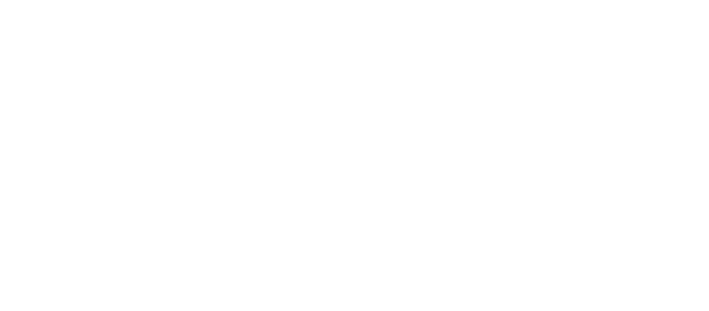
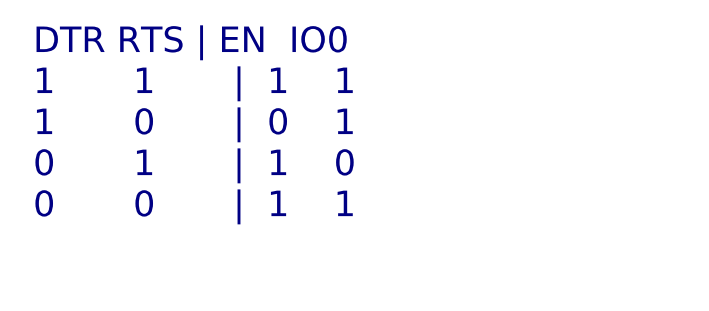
text: none -> DTR RTS | EN IO0 (191, 42)
text: none -> 1 1 | 1 1 (194, 83)
text: none -> 1 0 | 0 1 (194, 124)
text: none -> 0 1 | 1 0 (194, 165)
text: none -> 0 0 | 1 1 (194, 206)

